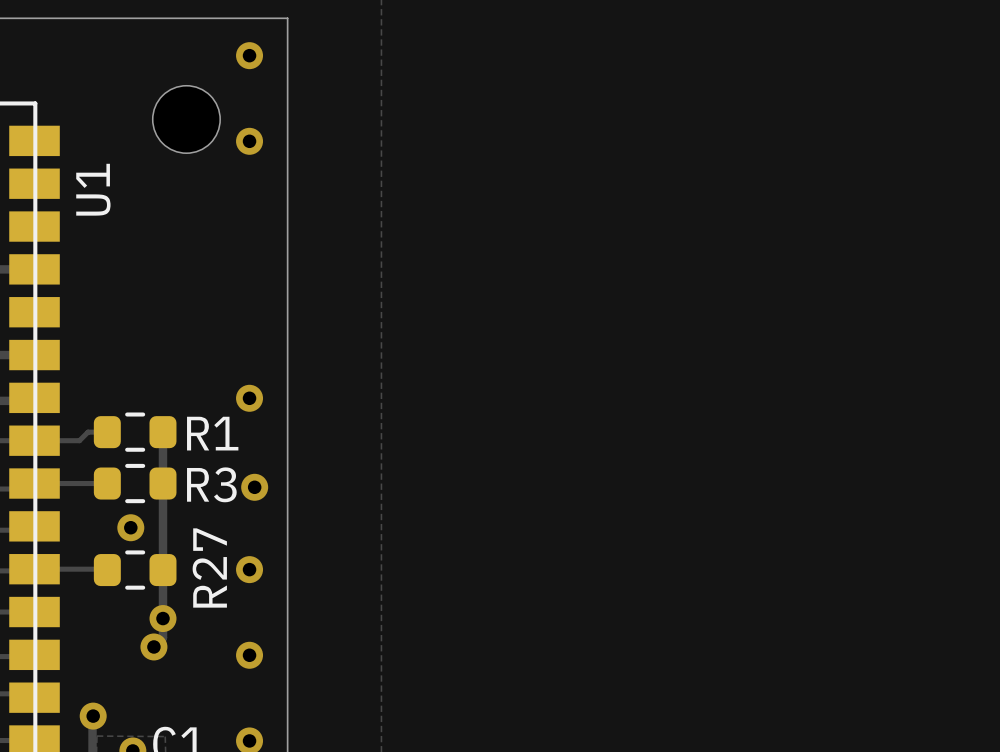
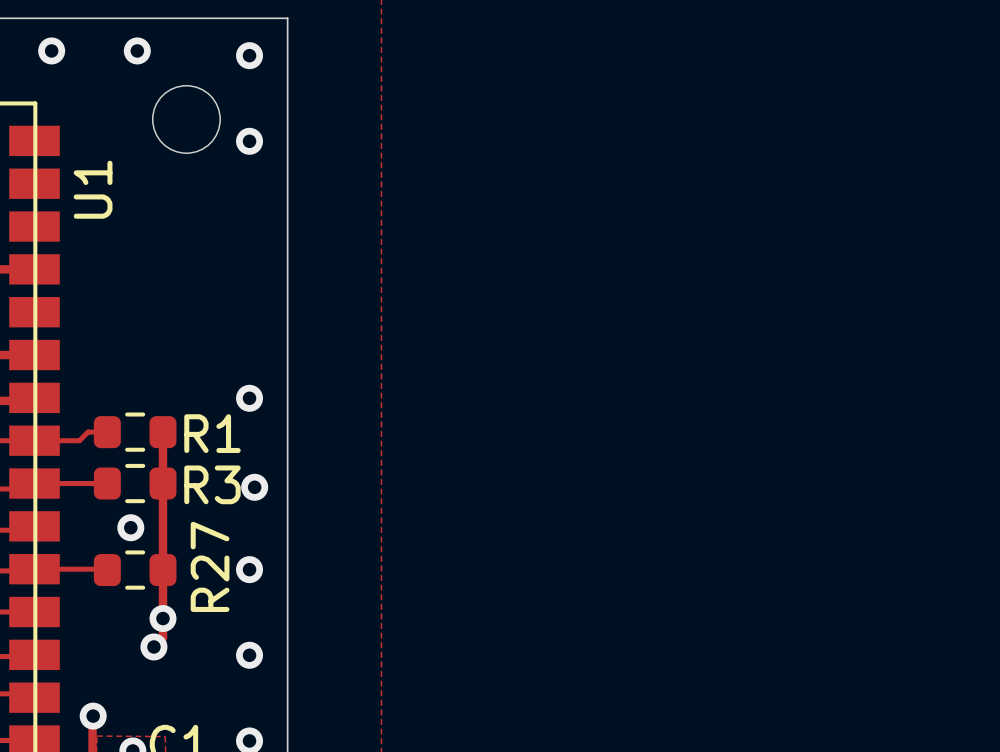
via: none -> (51, 50)
via: none -> (137, 50)

